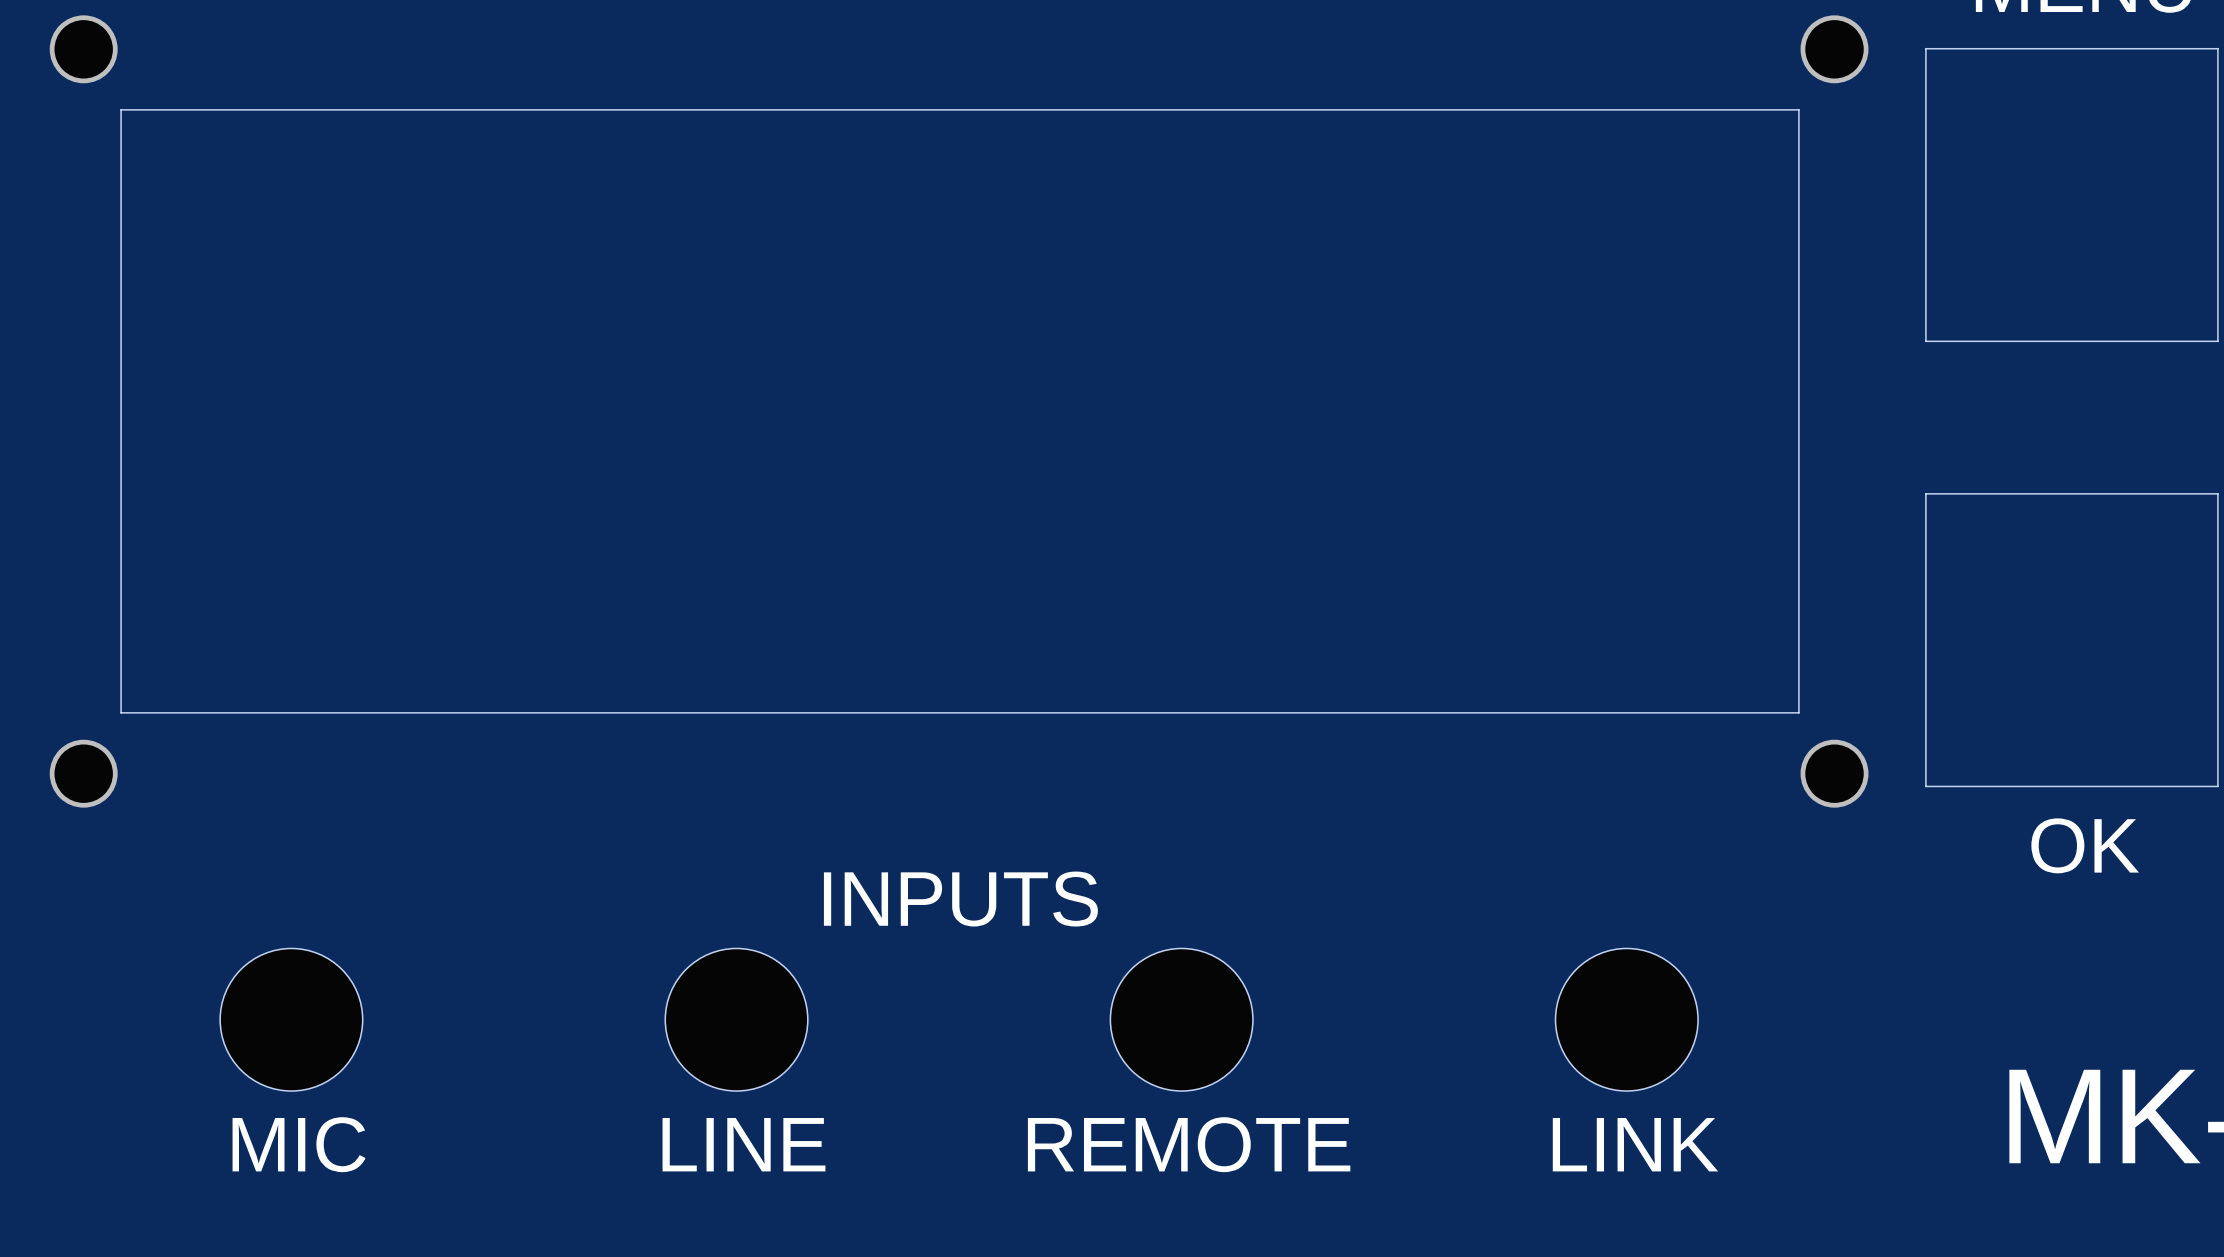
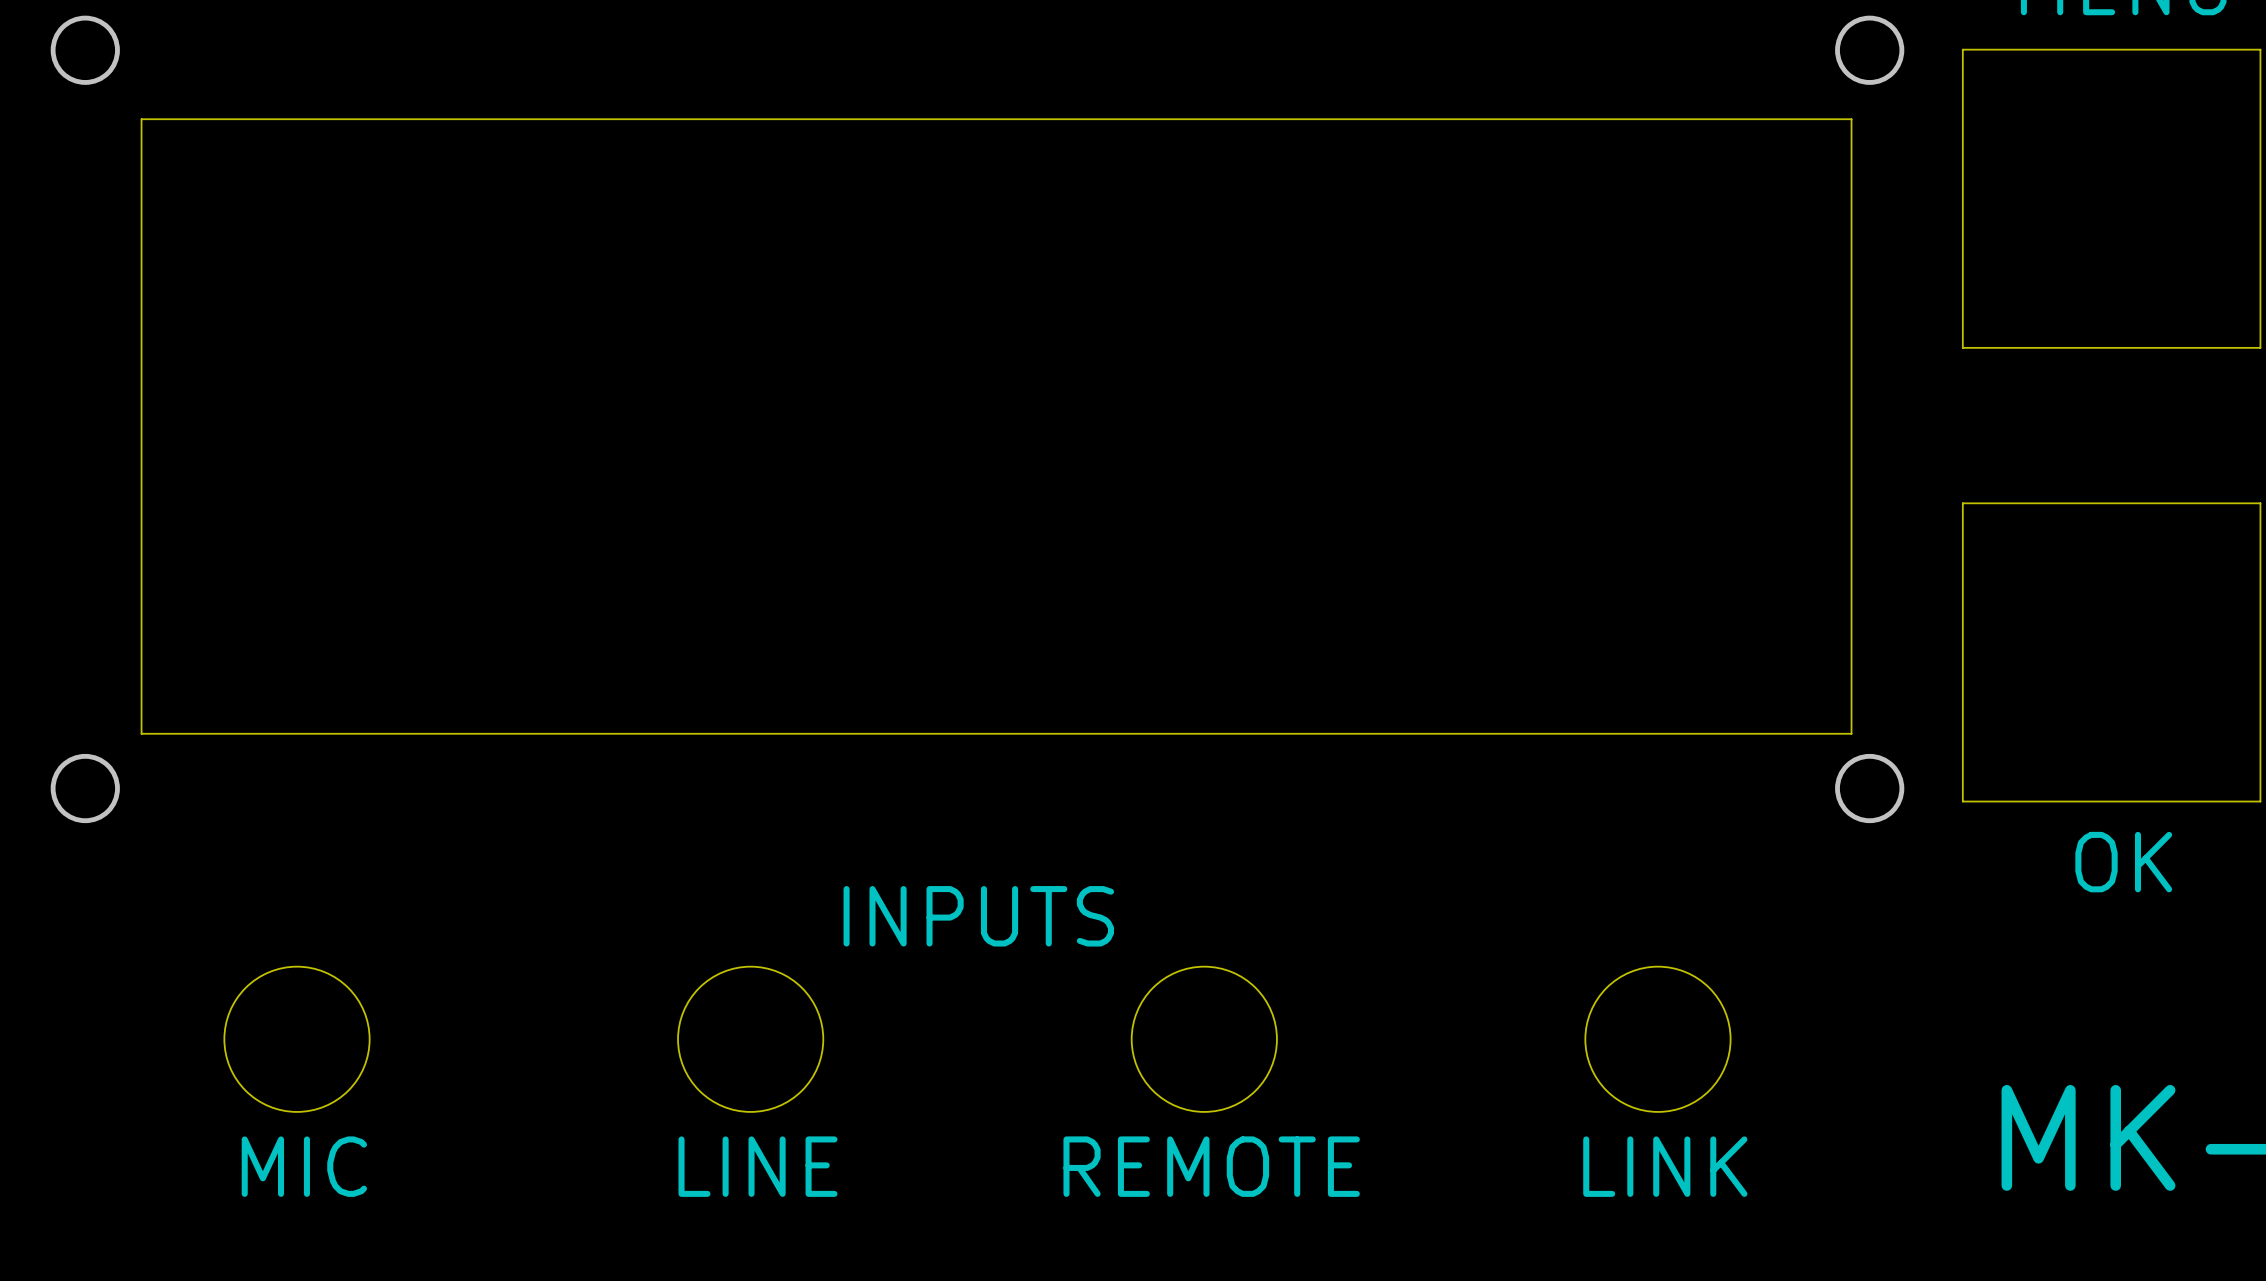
board edge: (121, 109) (1798, 109) (1798, 712) (121, 712) (121, 109) -> (141, 119) (1851, 119) (1851, 733) (141, 733) (141, 119)

